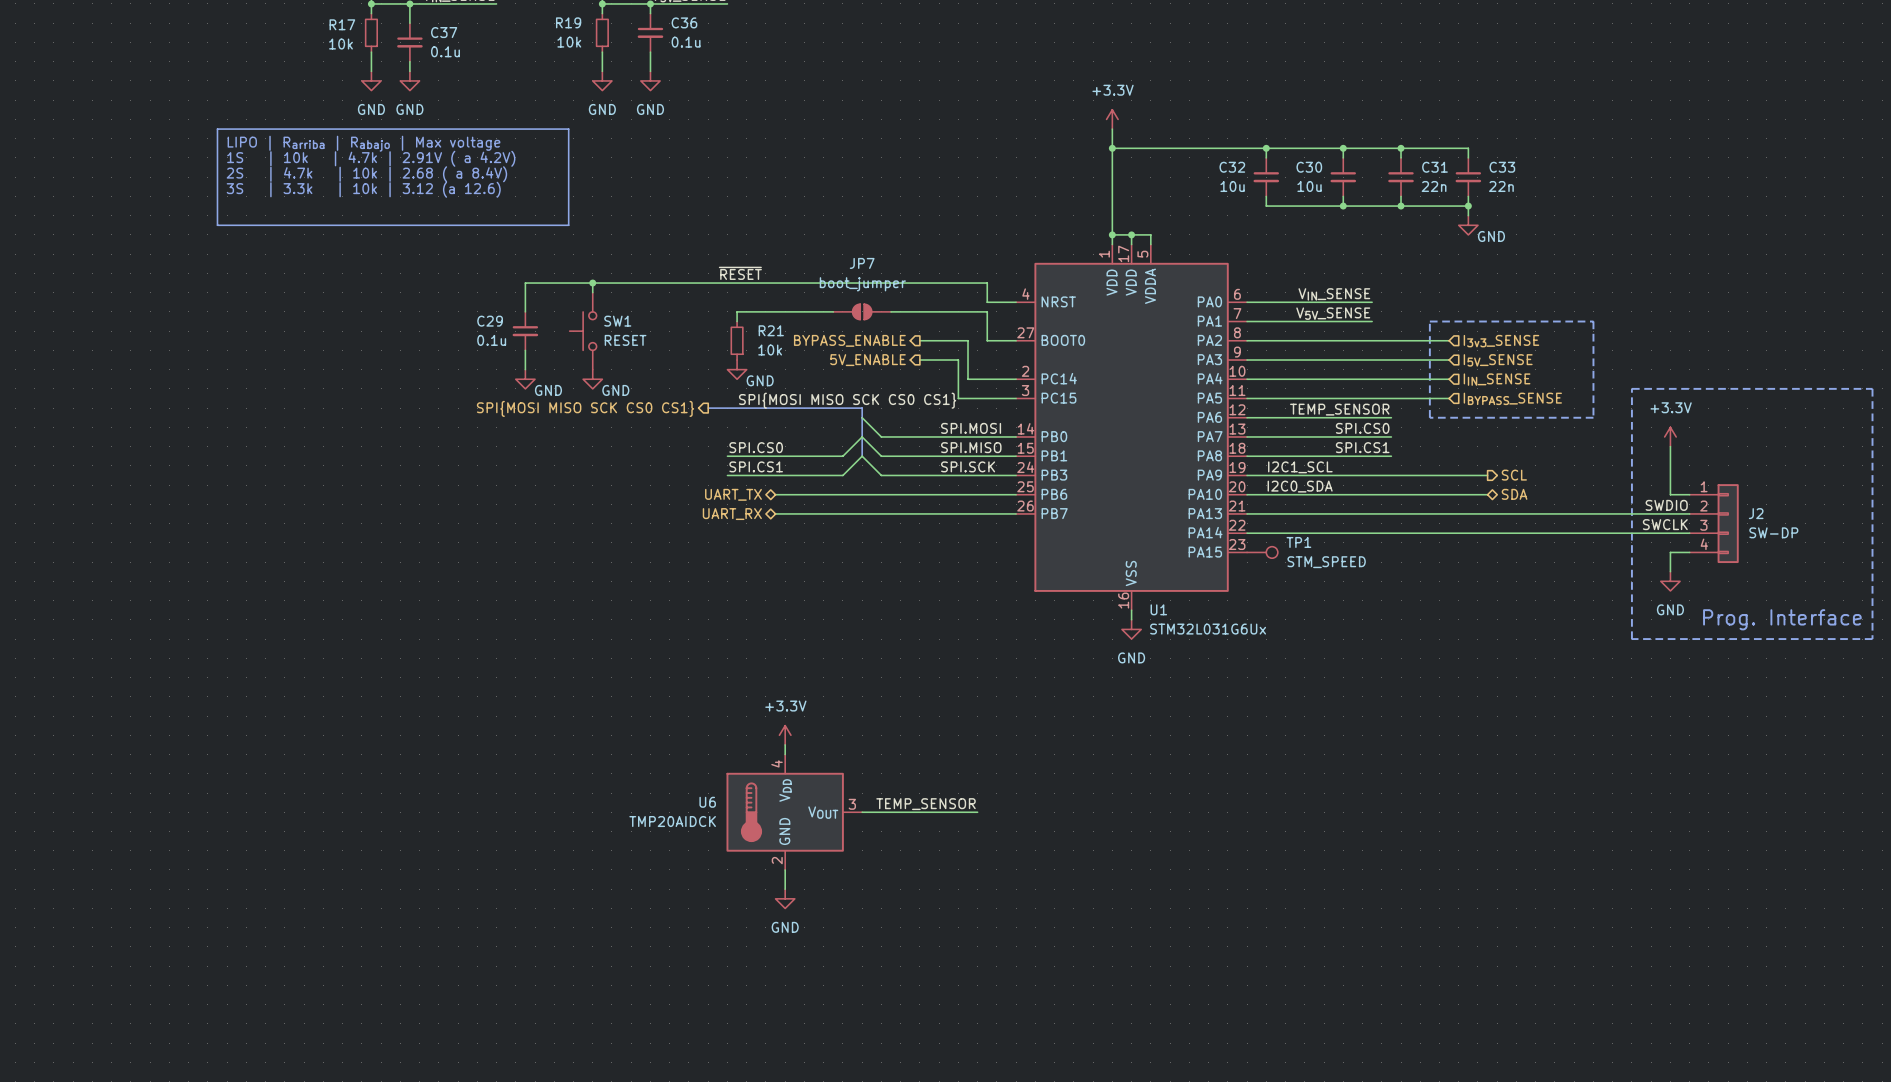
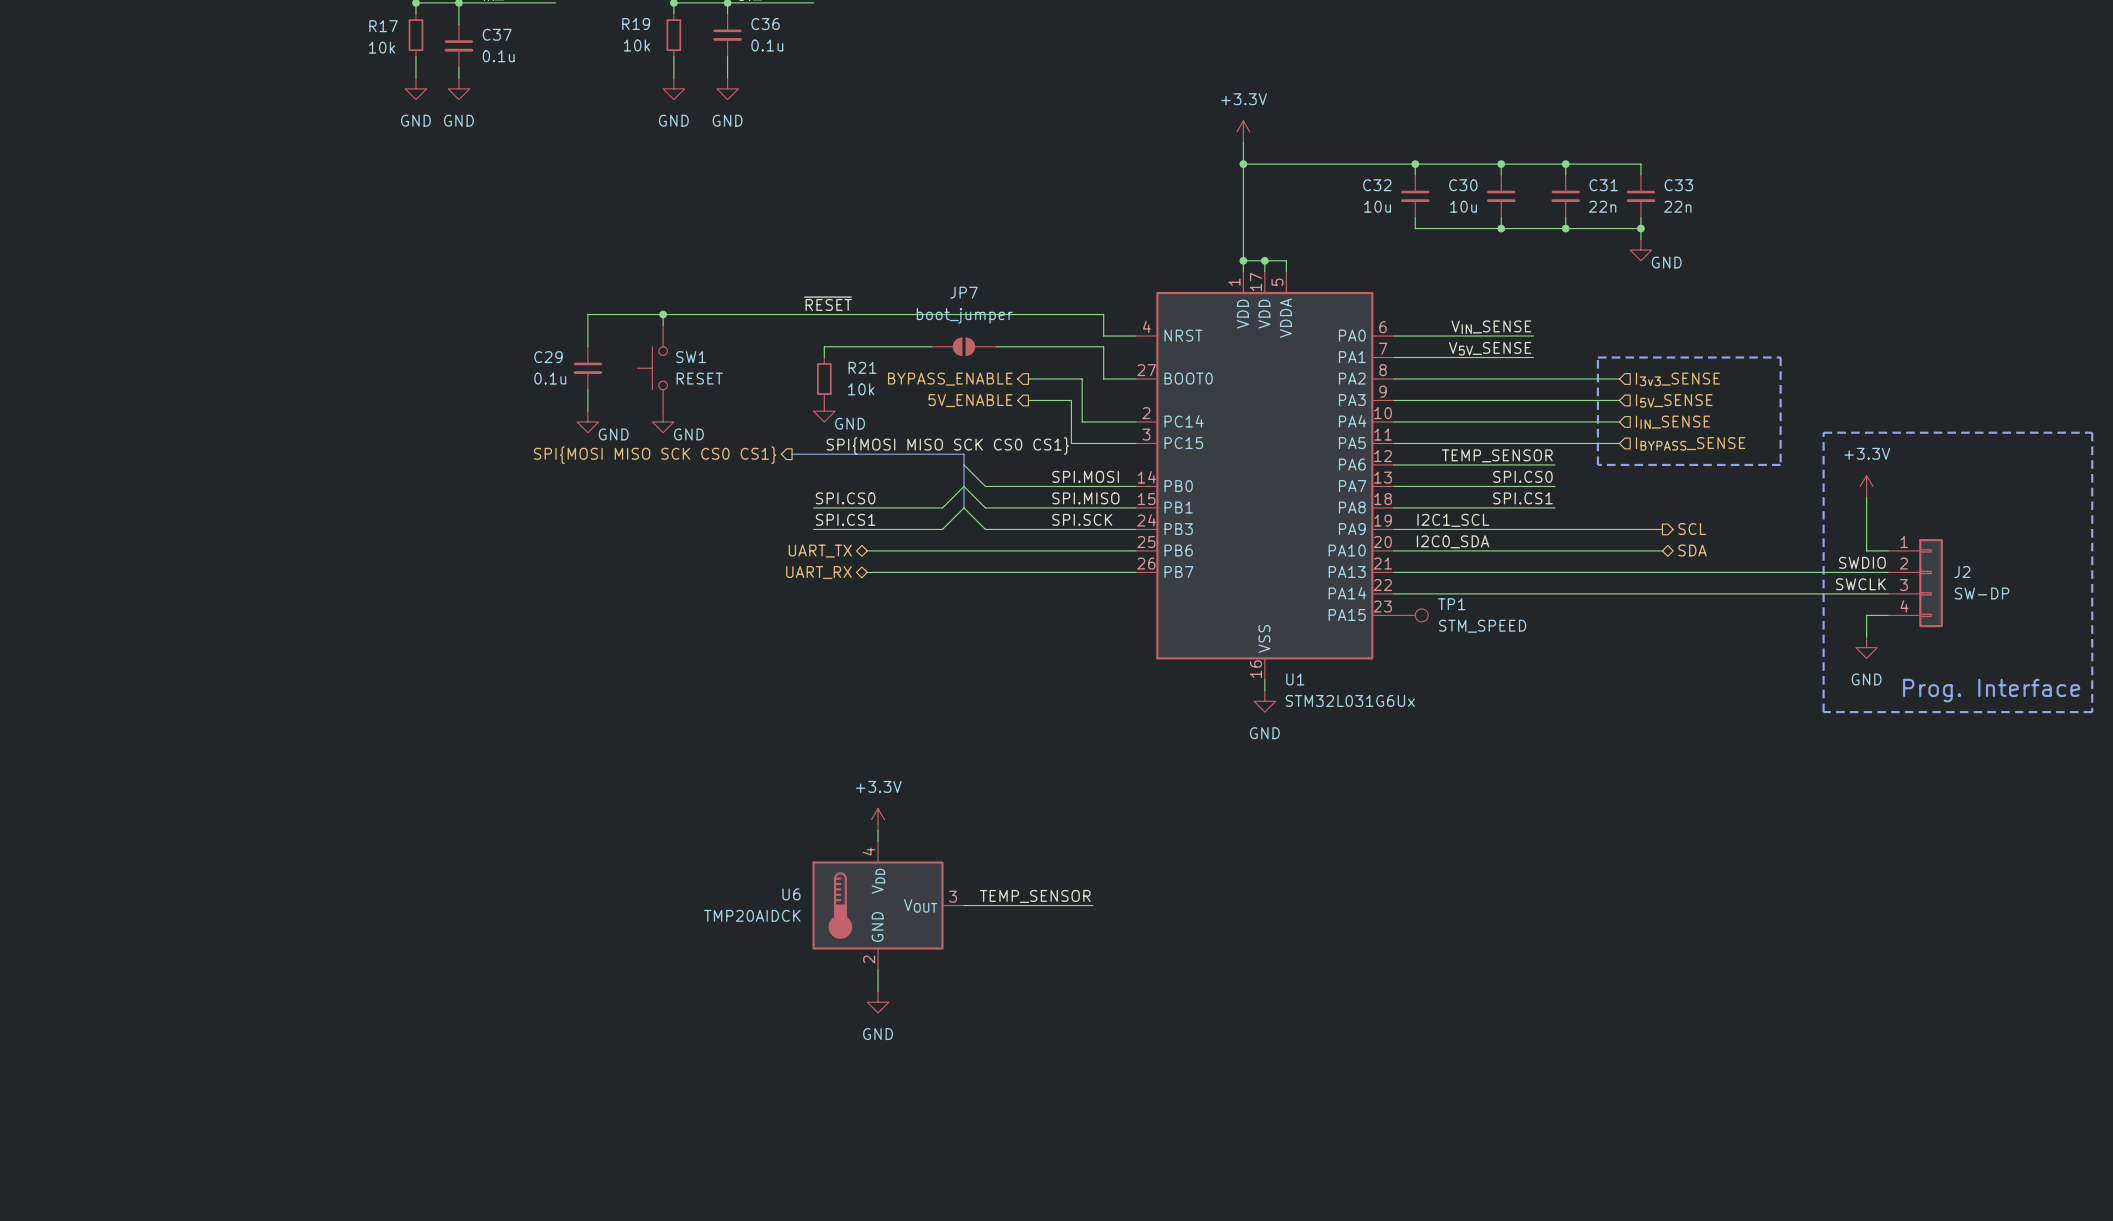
line: (217, 129) (568, 129) (568, 225) (217, 225) (217, 129) -> none
text: LIPO | Rarriba | Rabajo | Max voltage (363, 143) -> none
text: 1S | 10k | 4.7k | 2.91V ( a 4.2V) (371, 158) -> none
text: 2S | 4.7k | 10k | 2.68 ( a 8.4V) (366, 174) -> none
text: 3S | 3.3k | 10k | 3.12 (a 12.6) (363, 189) -> none

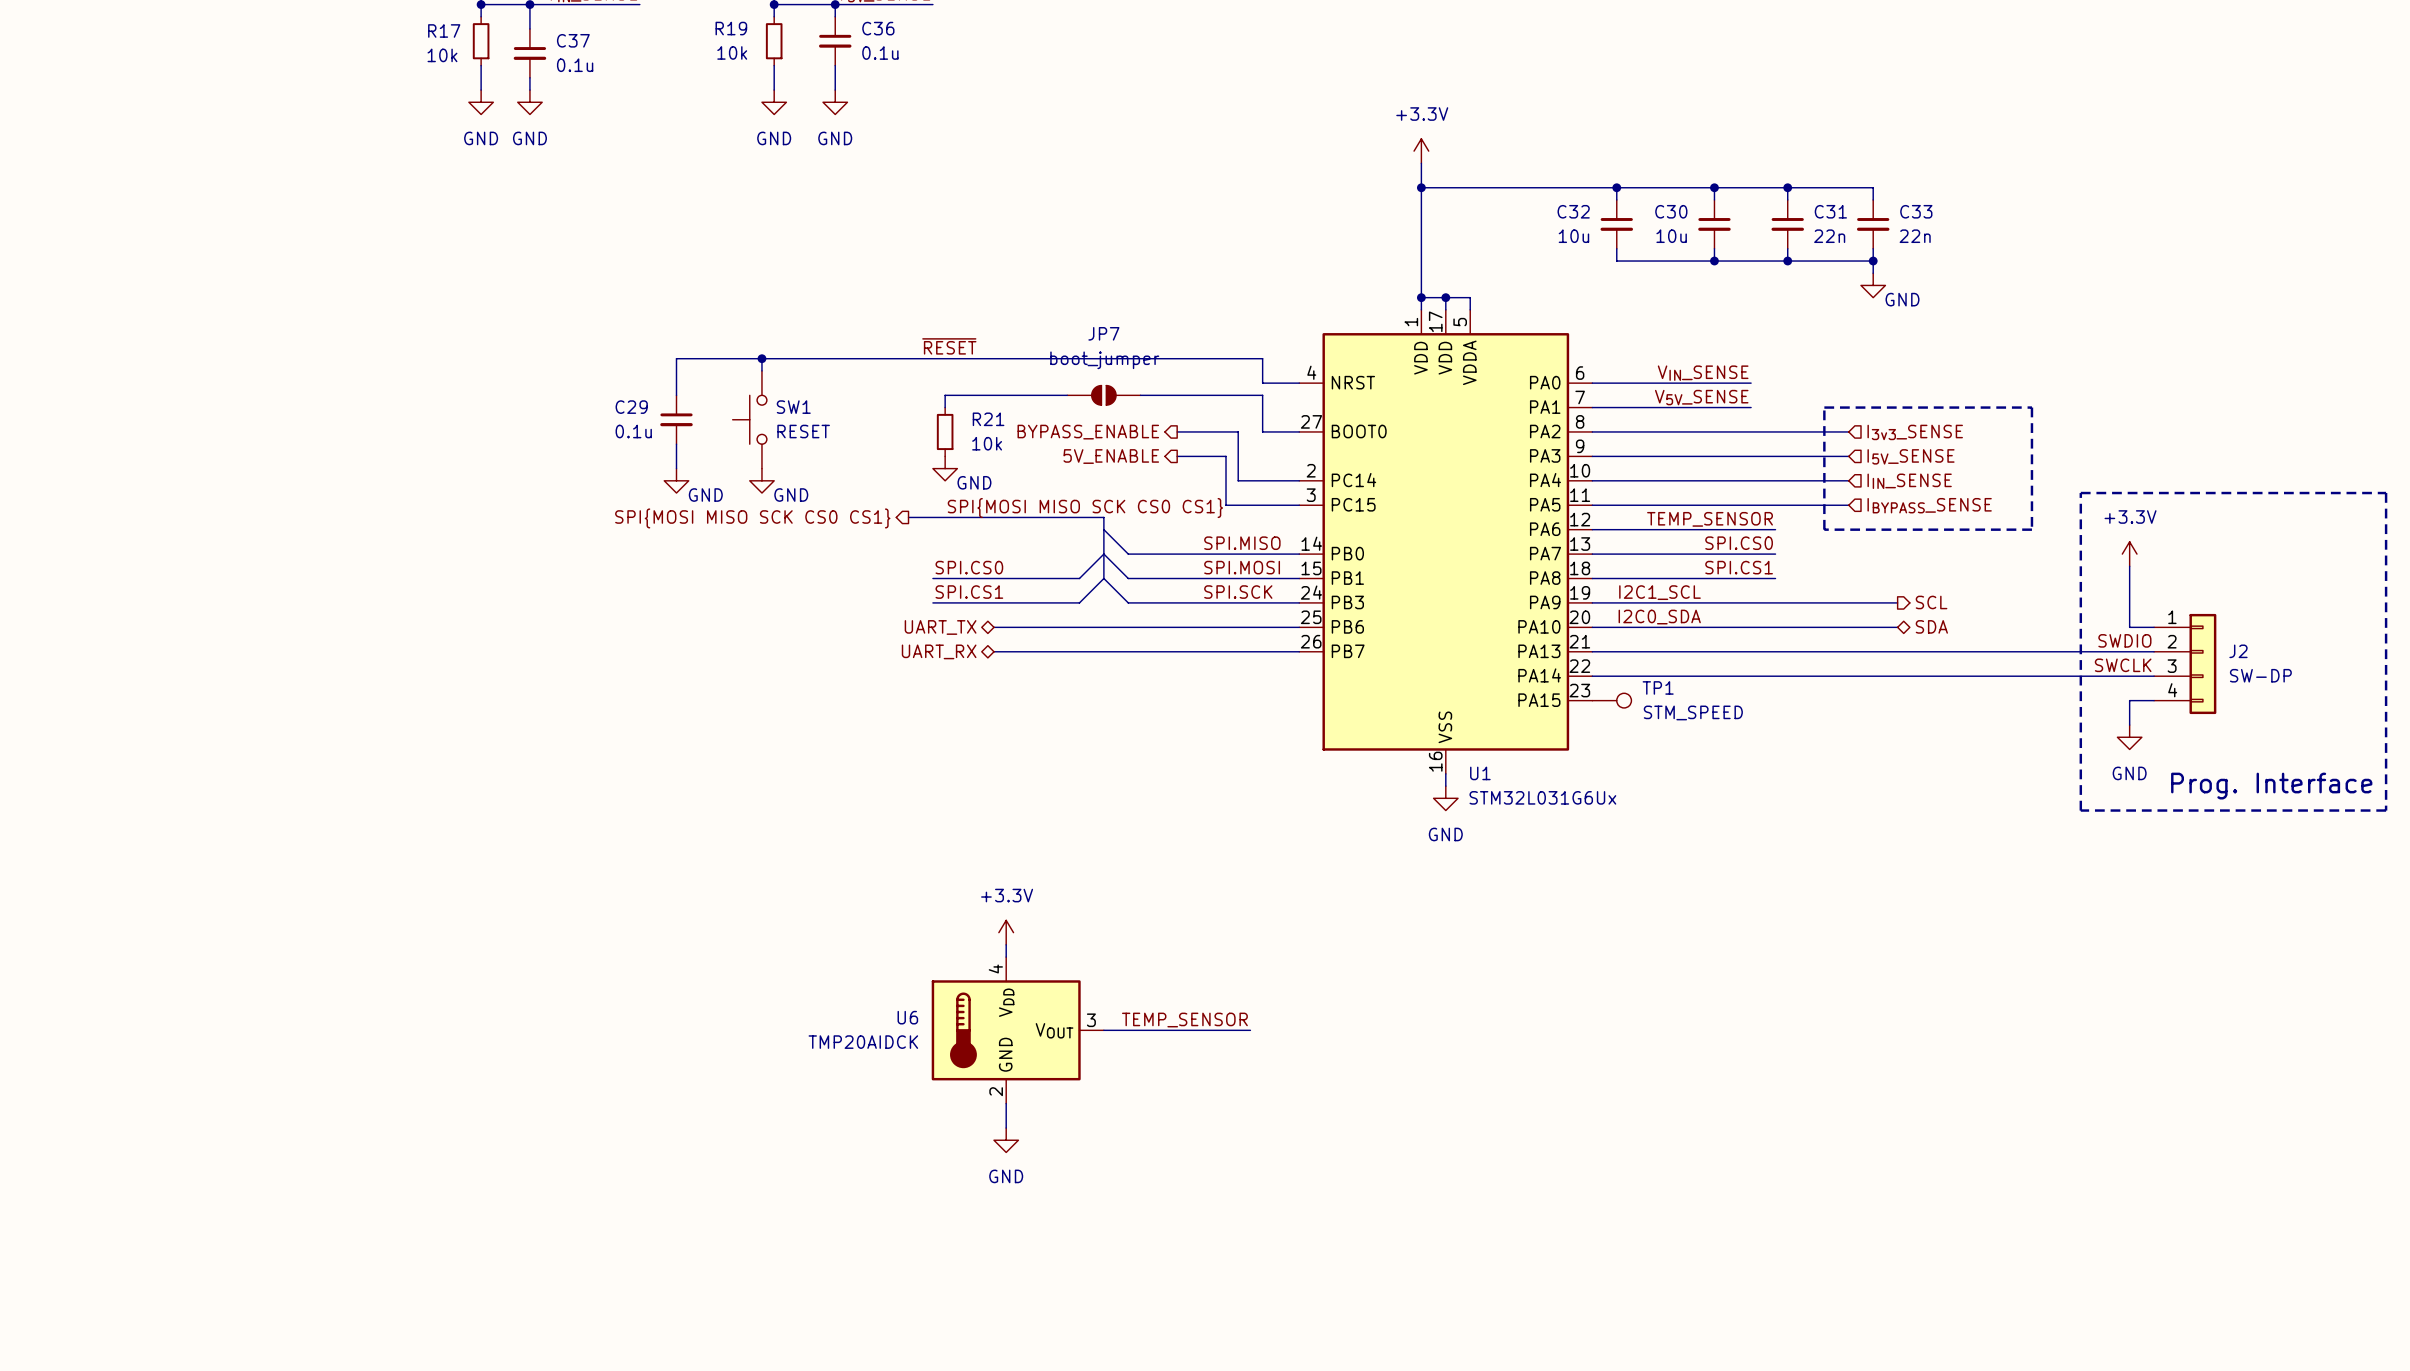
label: SPI.MOSI (1085, 476) -> SPI.MISO (1242, 543)
label: SPI.MISO (1085, 498) -> SPI.MOSI (1242, 567)

